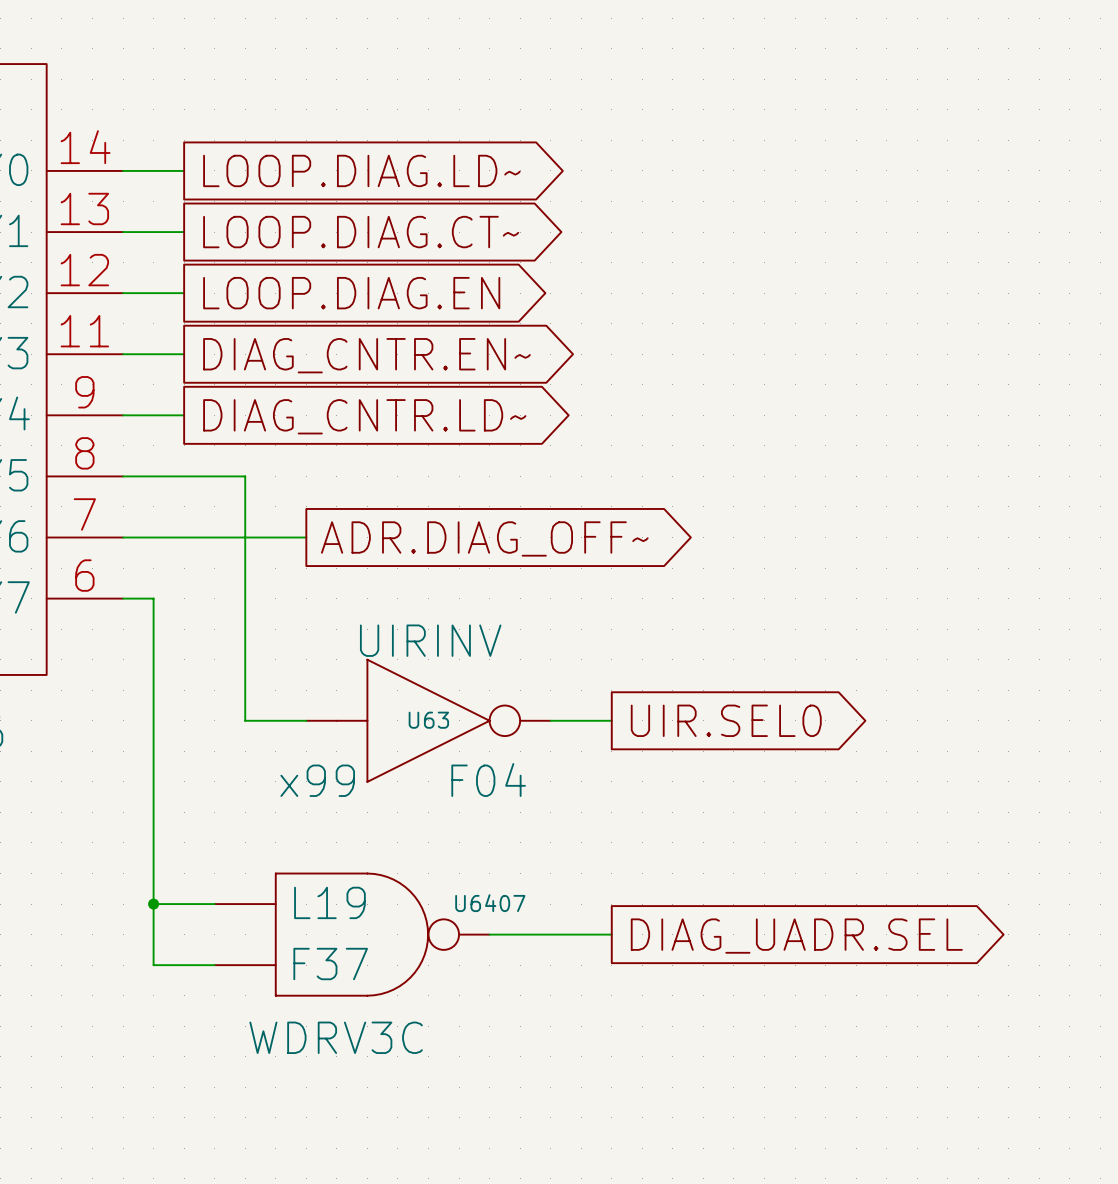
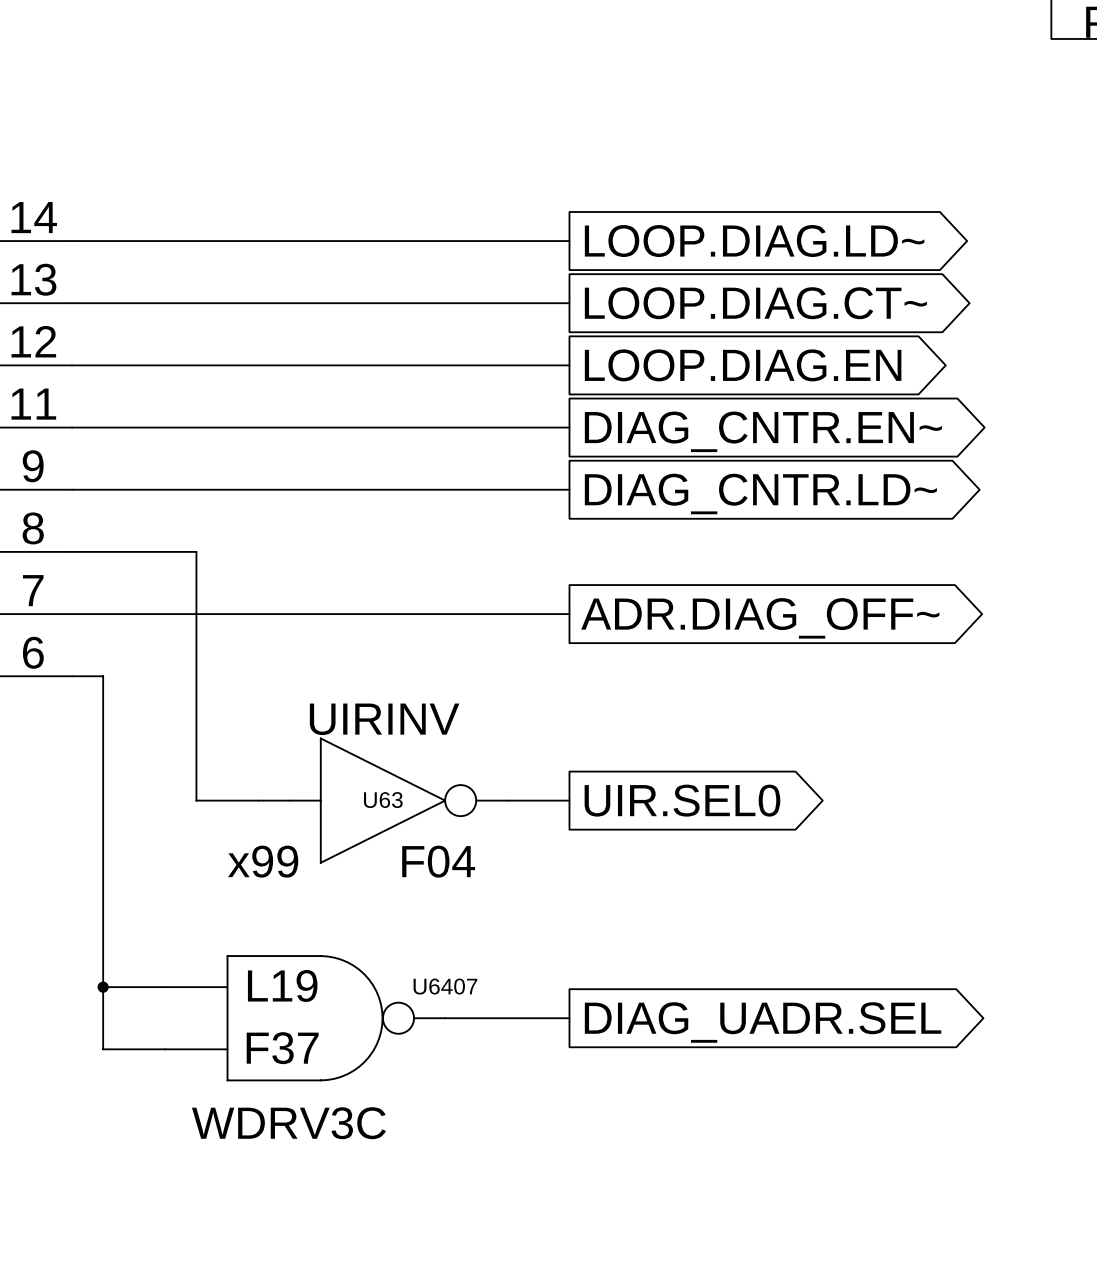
wire: none -> (134, 241) (569, 241)
global label: LOOP.DIAG.LD~ (361, 170) -> none
global label: none -> LOOP.DIAG.LD~ (754, 241)
wire: none -> (134, 303) (569, 303)
global label: LOOP.DIAG.CT~ (361, 232) -> none
global label: none -> LOOP.DIAG.CT~ (755, 303)
wire: none -> (134, 365) (569, 365)
global label: LOOP.DIAG.EN (351, 293) -> none
global label: none -> LOOP.DIAG.EN (743, 365)
wire: none -> (134, 427) (569, 427)
global label: DIAG_CNTR.EN~ (366, 355) -> none
global label: none -> DIAG_CNTR.EN~ (763, 431)
wire: none -> (134, 489) (569, 489)
global label: DIAG_CNTR.LD~ (364, 416) -> none
global label: none -> DIAG_CNTR.LD~ (760, 494)
wire: none -> (258, 614) (569, 614)
global label: ADR.DIAG_OFF~ (484, 538) -> none
global label: none -> ADR.DIAG_OFF~ (760, 618)

